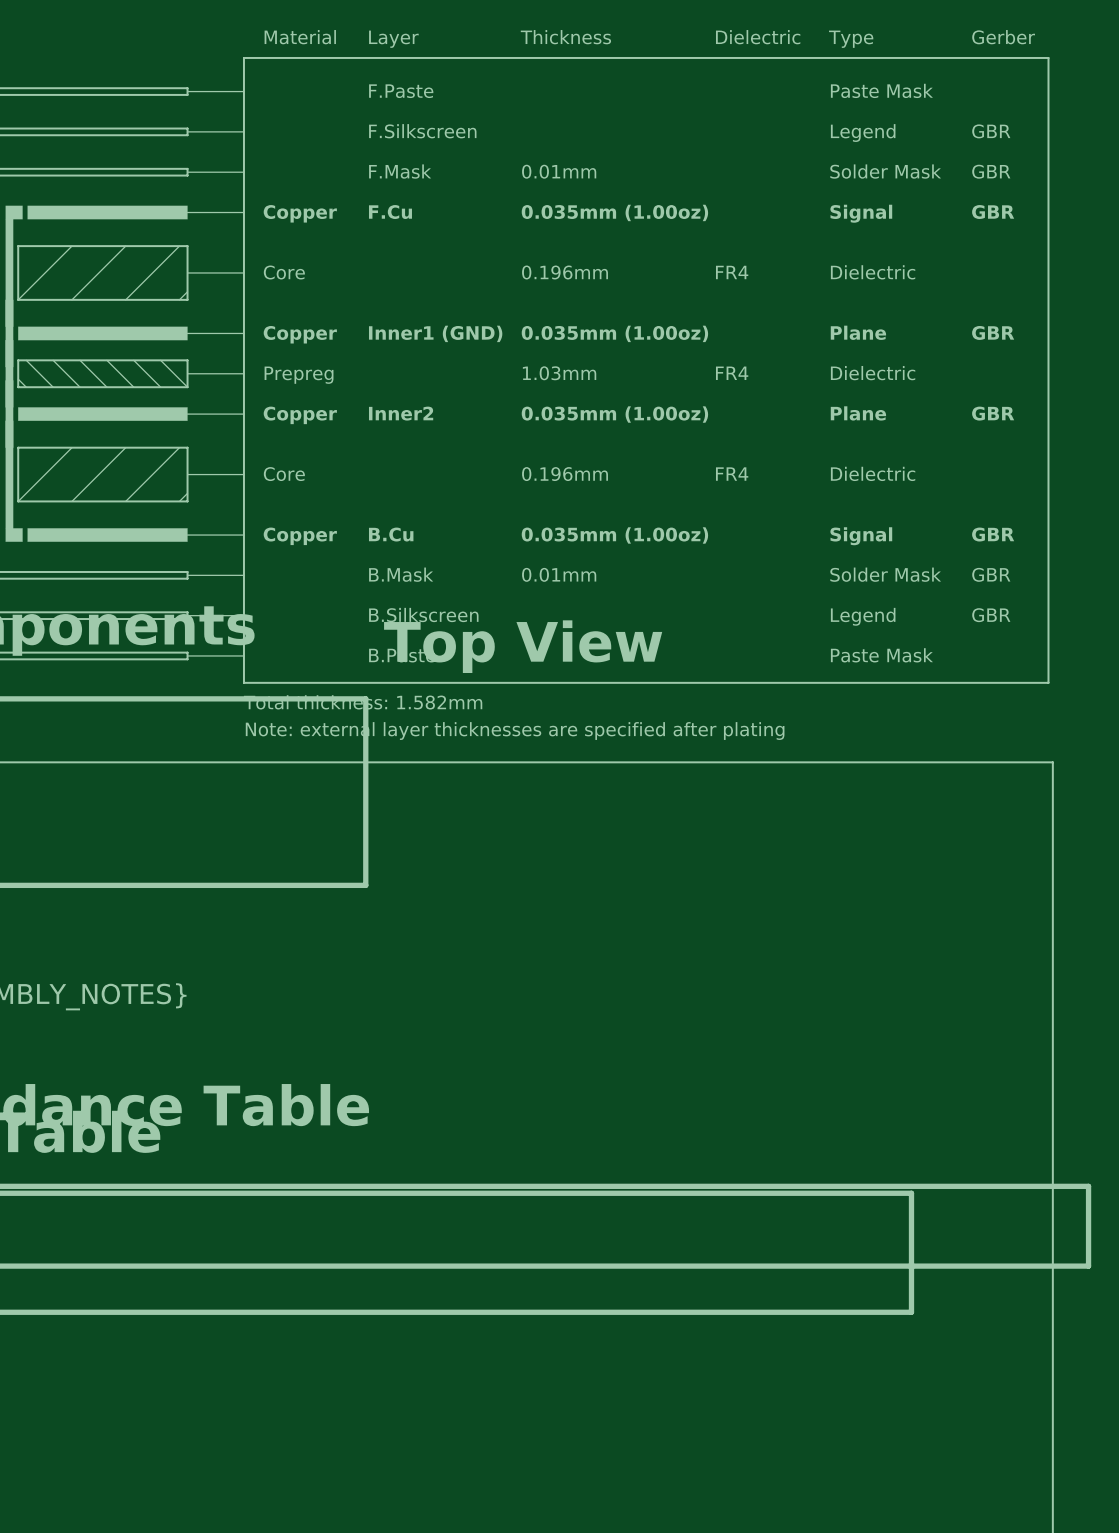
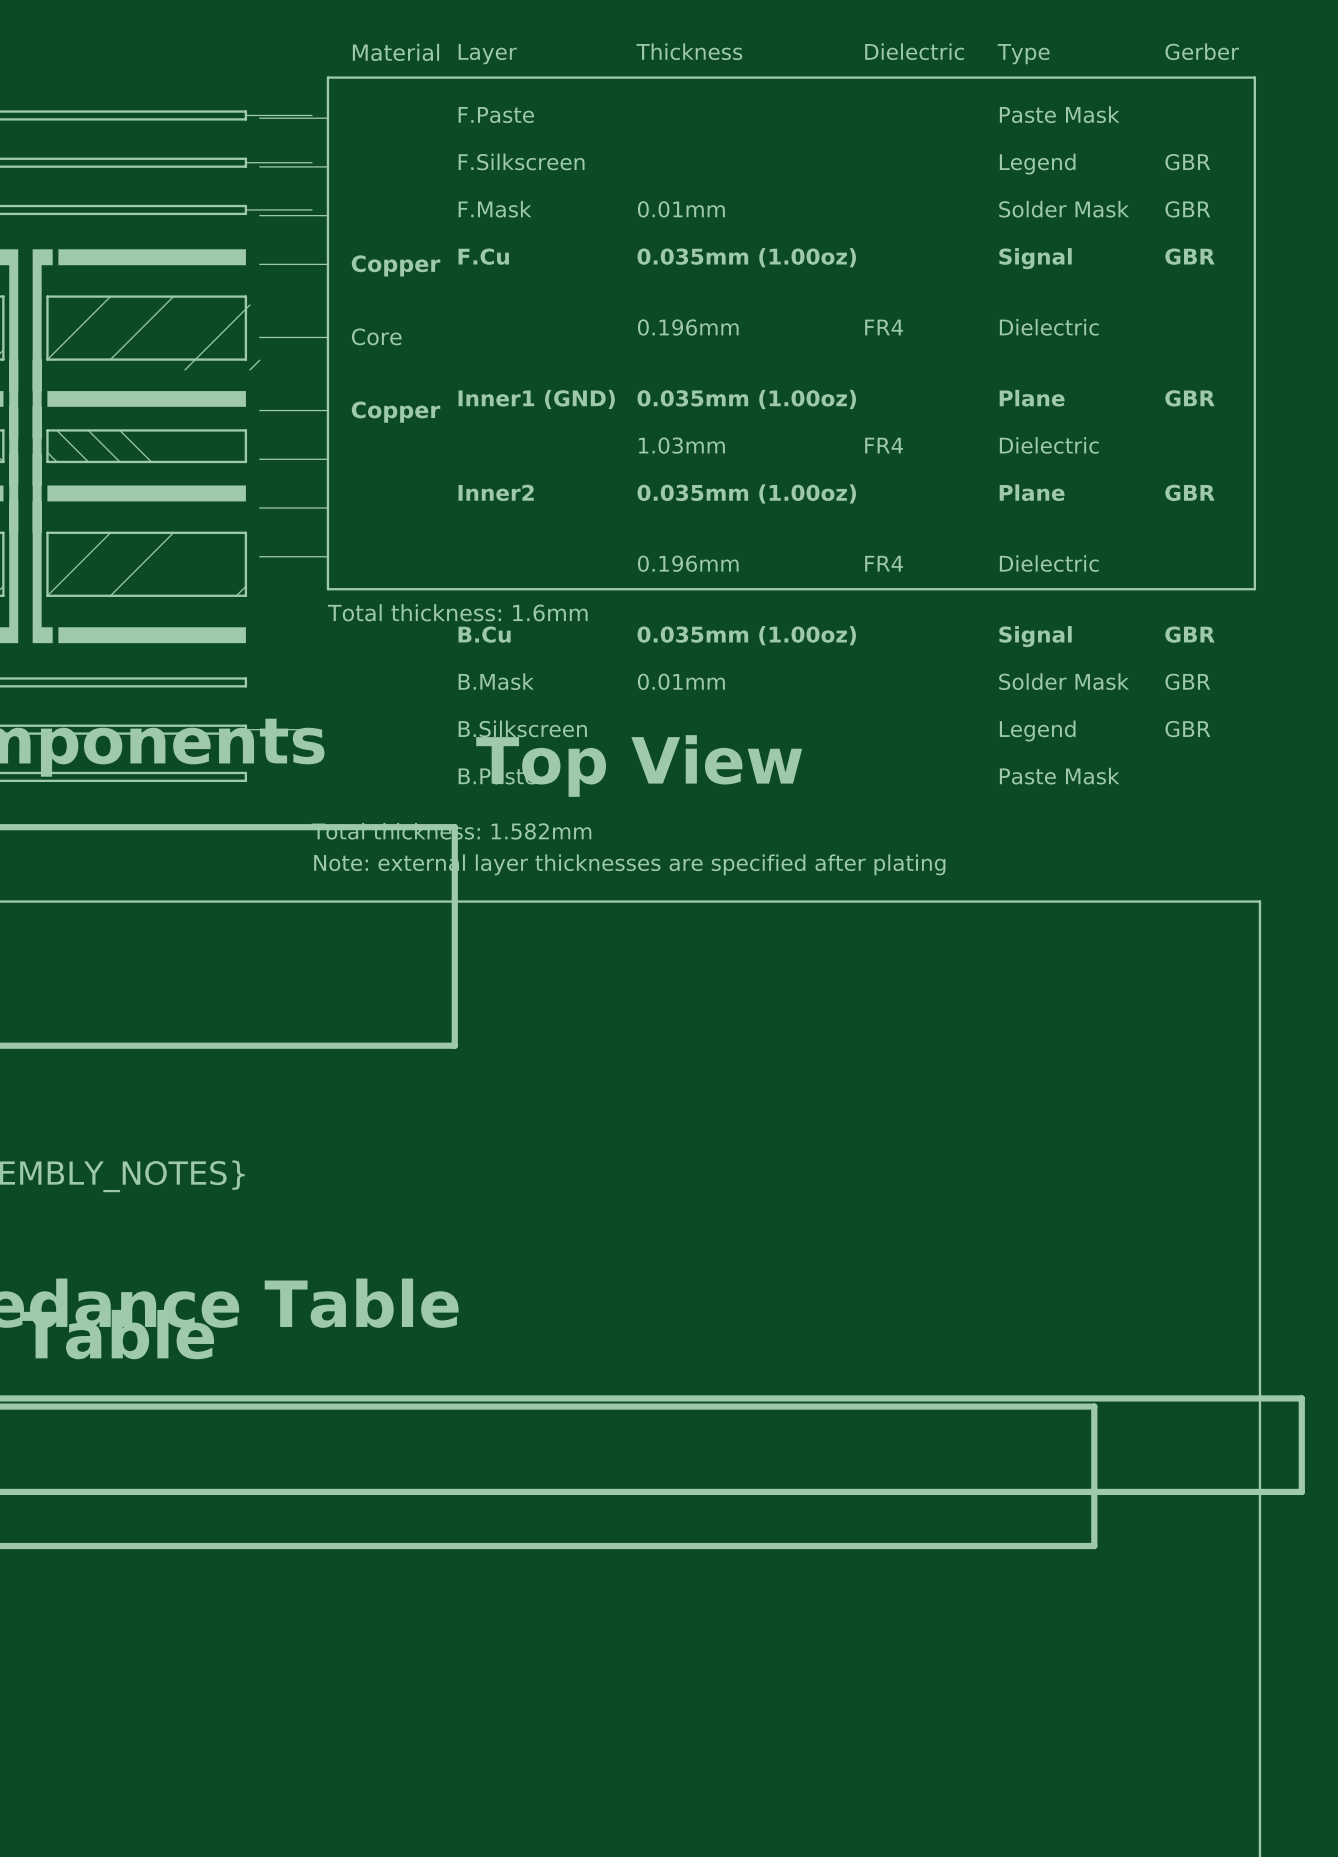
text position: Material (300, 37) -> Material (395, 52)
line: (1048, 59) (243, 57) (243, 682) (1048, 682) (1048, 495) -> (1254, 77) (327, 77) (327, 589) (1254, 589)
line: none -> (259, 118) (327, 118)
line: none -> (259, 166) (327, 166)
line: none -> (259, 215) (327, 215)
line: (187, 212) (243, 212) -> none
text position: Copper (300, 213) -> Copper (396, 265)
line: none -> (259, 264) (327, 264)
line: (179, 246) (125, 299) -> none
line: none -> (249, 304) (185, 369)
line: (187, 272) (243, 272) -> none
text position: Core (284, 272) -> Core (376, 336)
line: none -> (259, 337) (327, 337)
line: (187, 291) (179, 299) -> (259, 360) (249, 369)
line: (187, 333) (243, 333) -> none
text position: Copper (300, 334) -> Copper (396, 412)
line: none -> (259, 410) (327, 410)
line: (106, 360) (133, 387) -> none
line: (133, 360) (160, 387) -> none
line: (160, 360) (187, 387) -> none
line: (187, 373) (243, 373) -> none
text: Prepreg (299, 375) -> none
line: none -> (259, 459) (327, 459)
line: (187, 414) (243, 414) -> none
text: Copper (300, 415) -> none
line: none -> (259, 508) (327, 508)
line: (179, 447) (125, 501) -> none
line: none -> (259, 556) (327, 556)
line: (187, 474) (243, 474) -> none
text: Core (284, 474) -> none
text: none -> Total thickness: 1.6mm (457, 612)
line: (187, 535) (243, 535) -> none
text: Copper (300, 536) -> none
line: (187, 575) (243, 575) -> none
line: (187, 655) (243, 655) -> none

